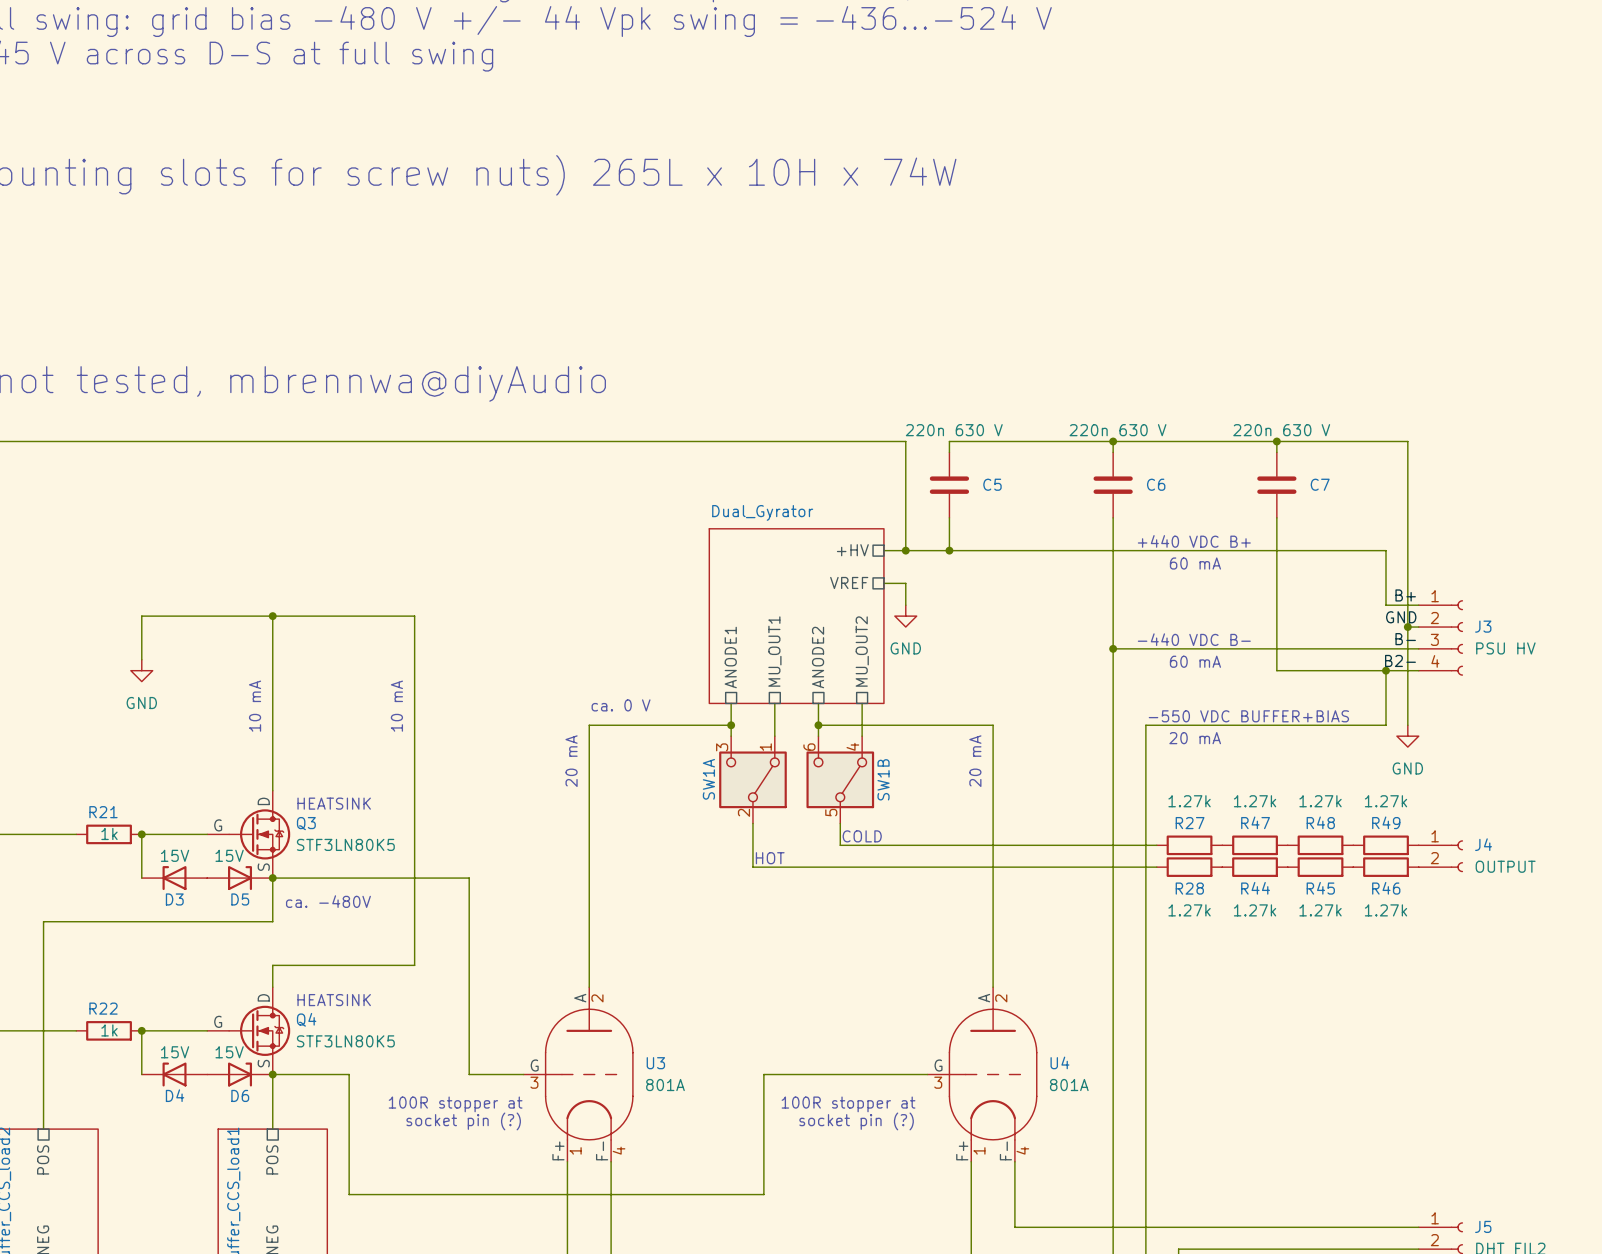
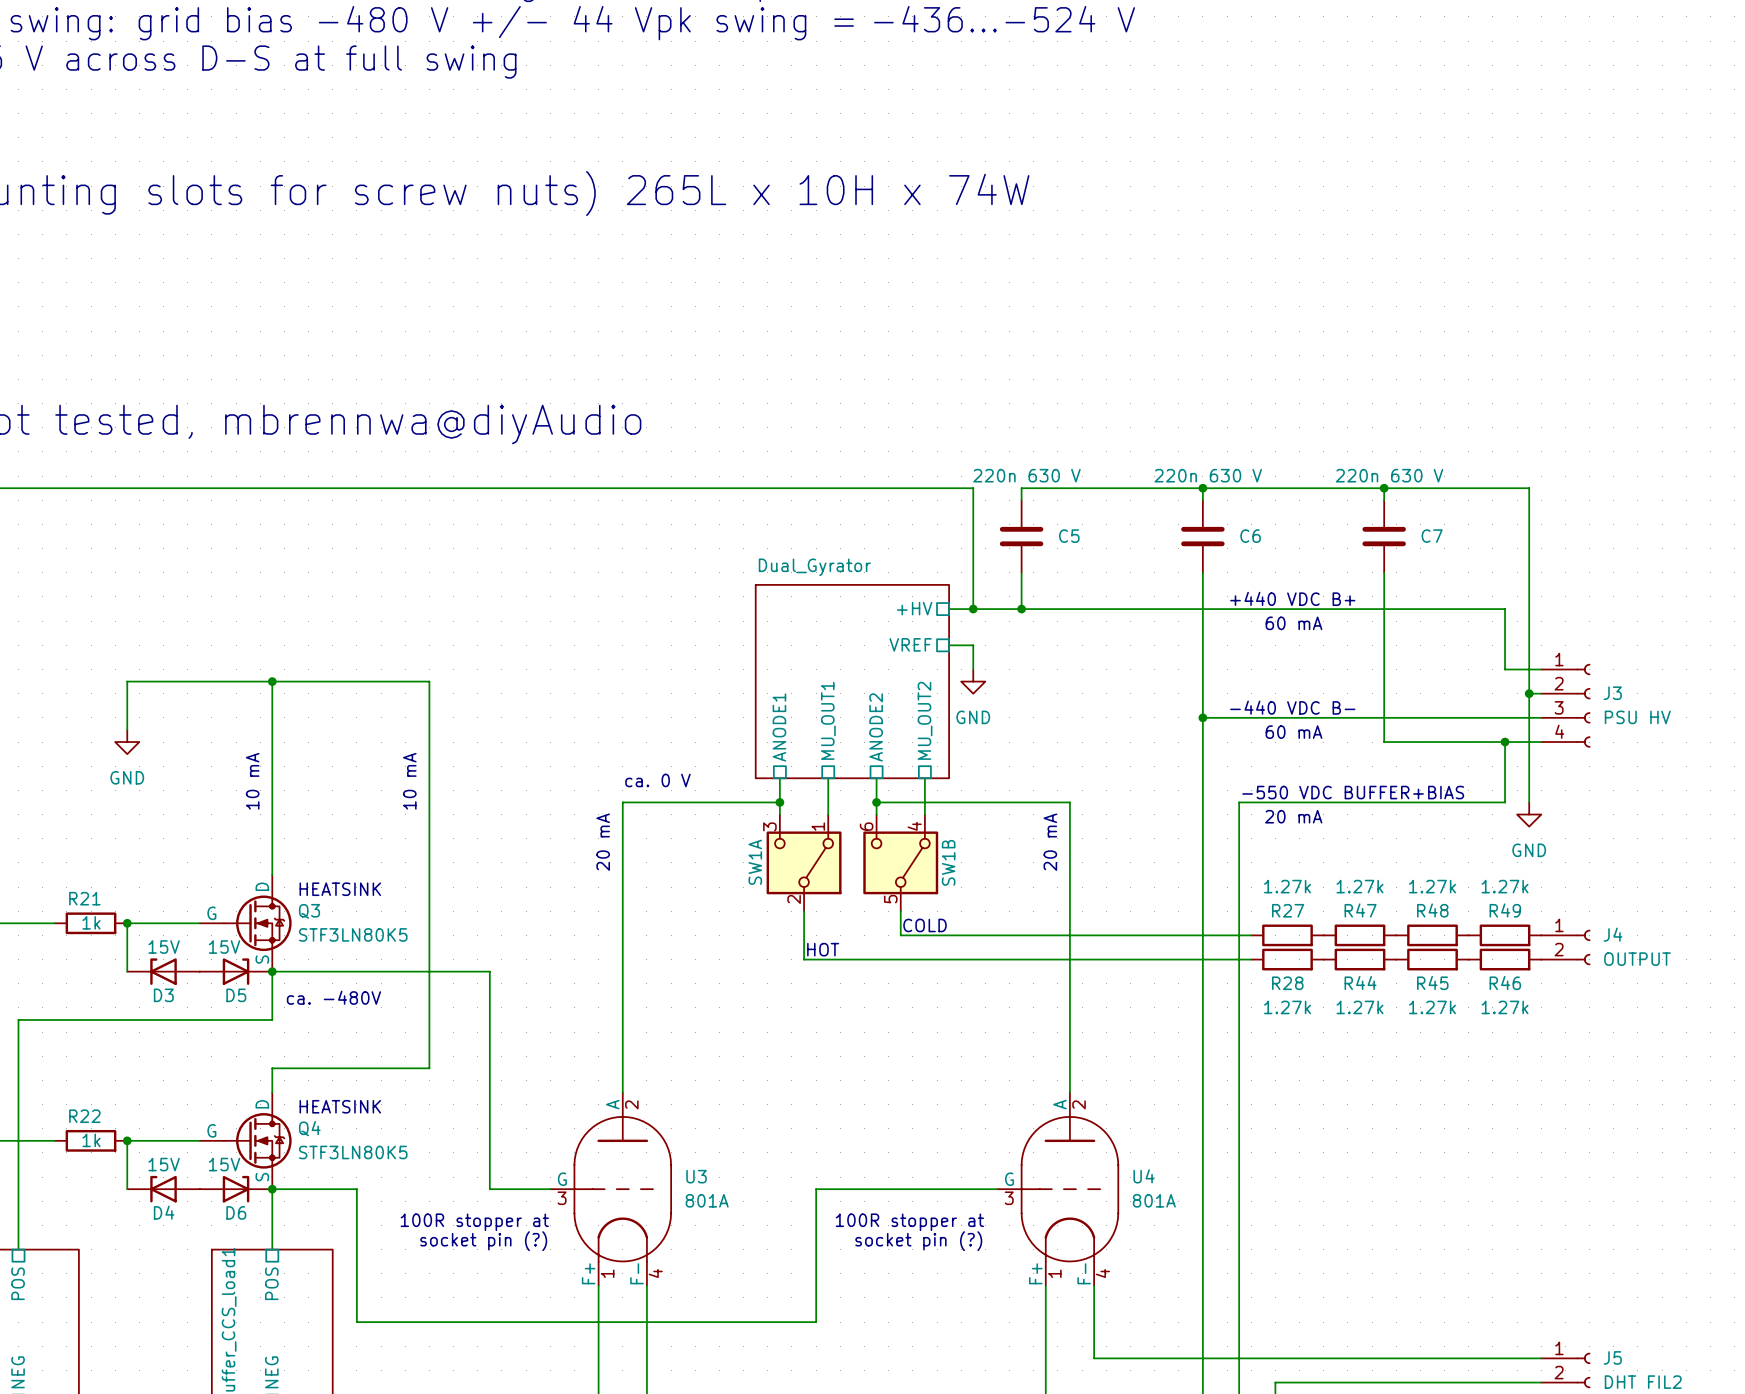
label: B+ (1405, 595) -> none
label: GND (1401, 617) -> none
label: B- (1405, 639) -> none
label: B2- (1400, 660) -> none

